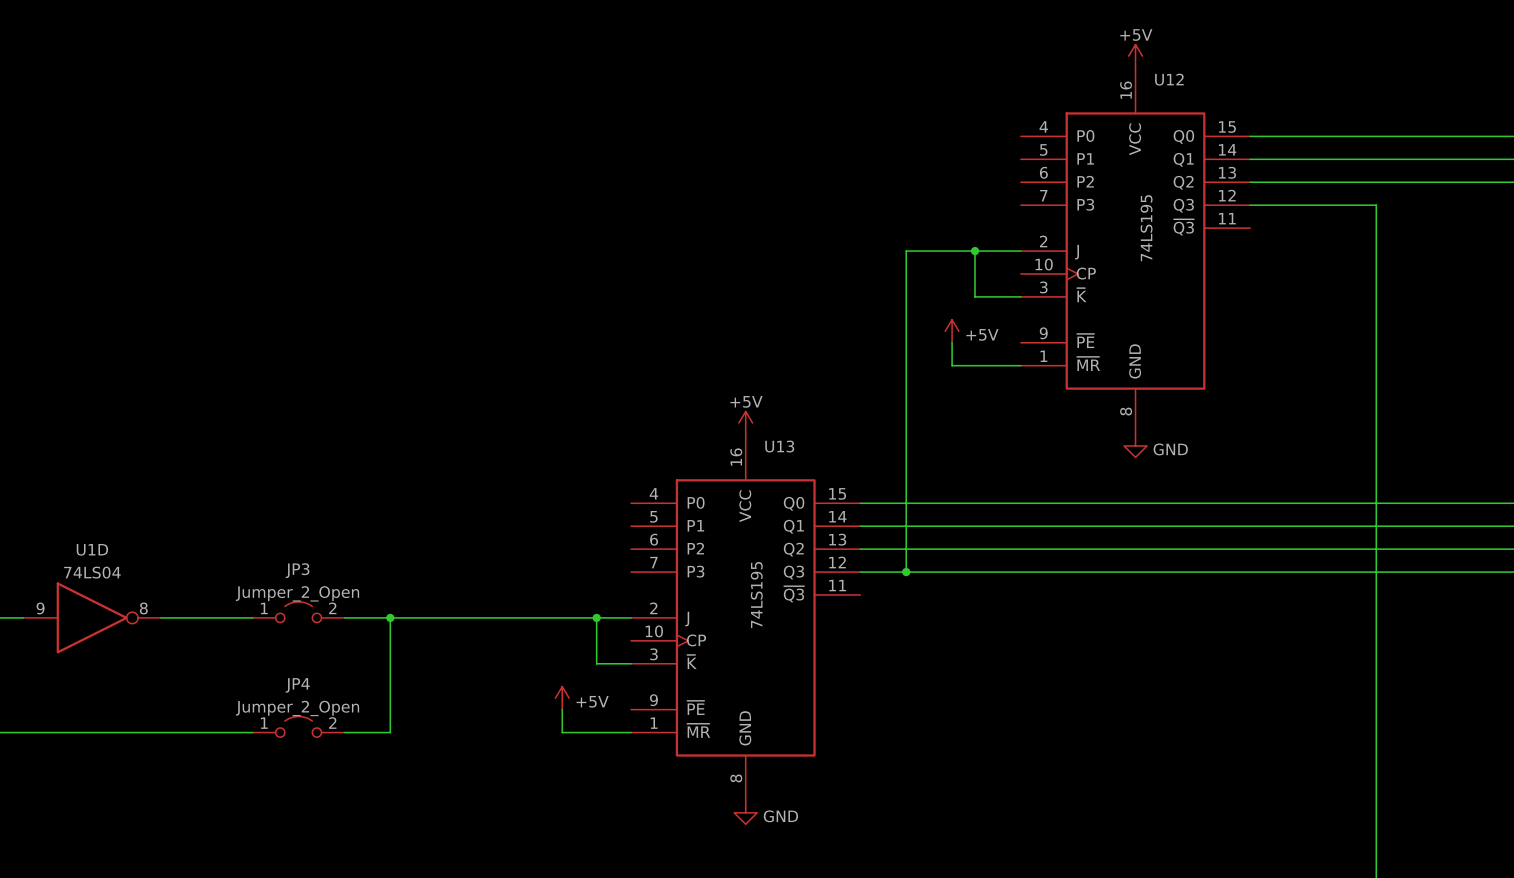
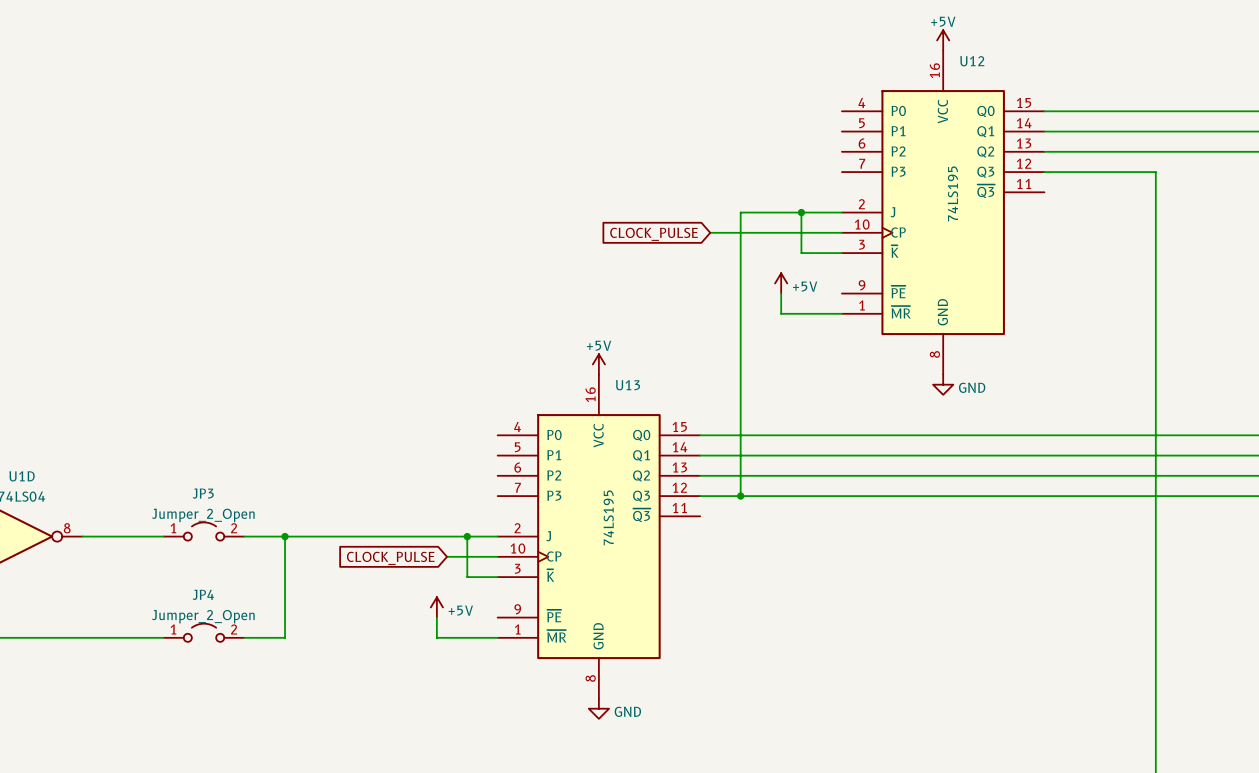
wire: none -> (710, 232) (841, 232)
global label: none -> CLOCK_PULSE (654, 234)
wire: none -> (447, 556) (497, 556)
global label: none -> CLOCK_PULSE (390, 558)

